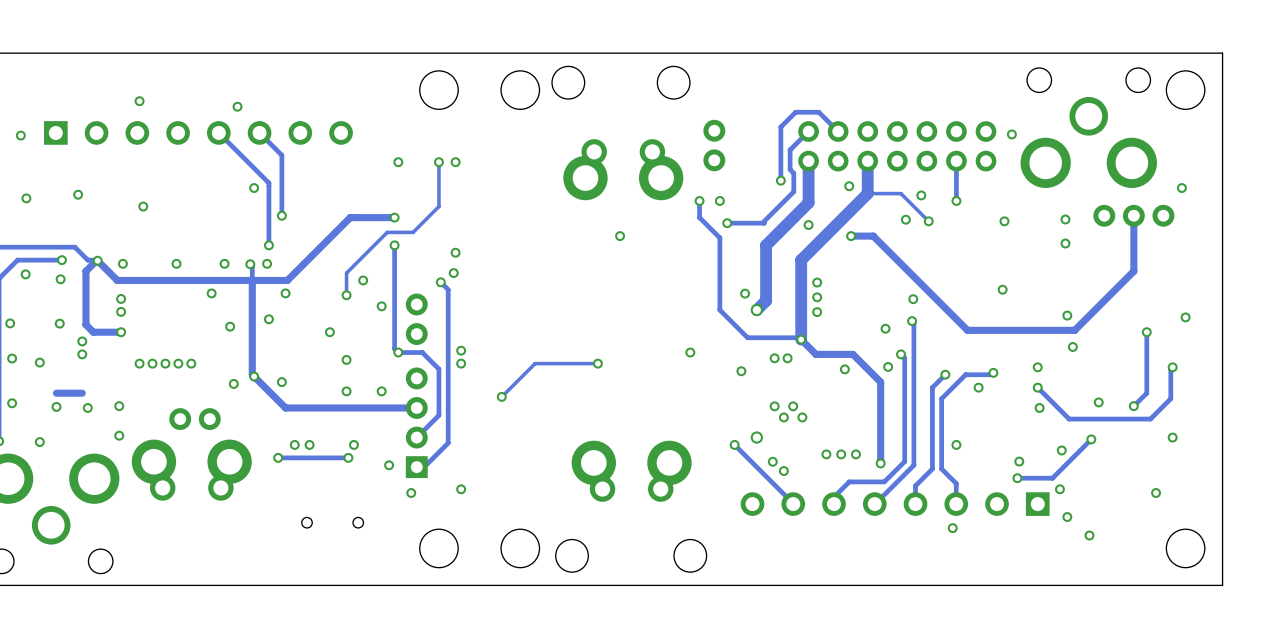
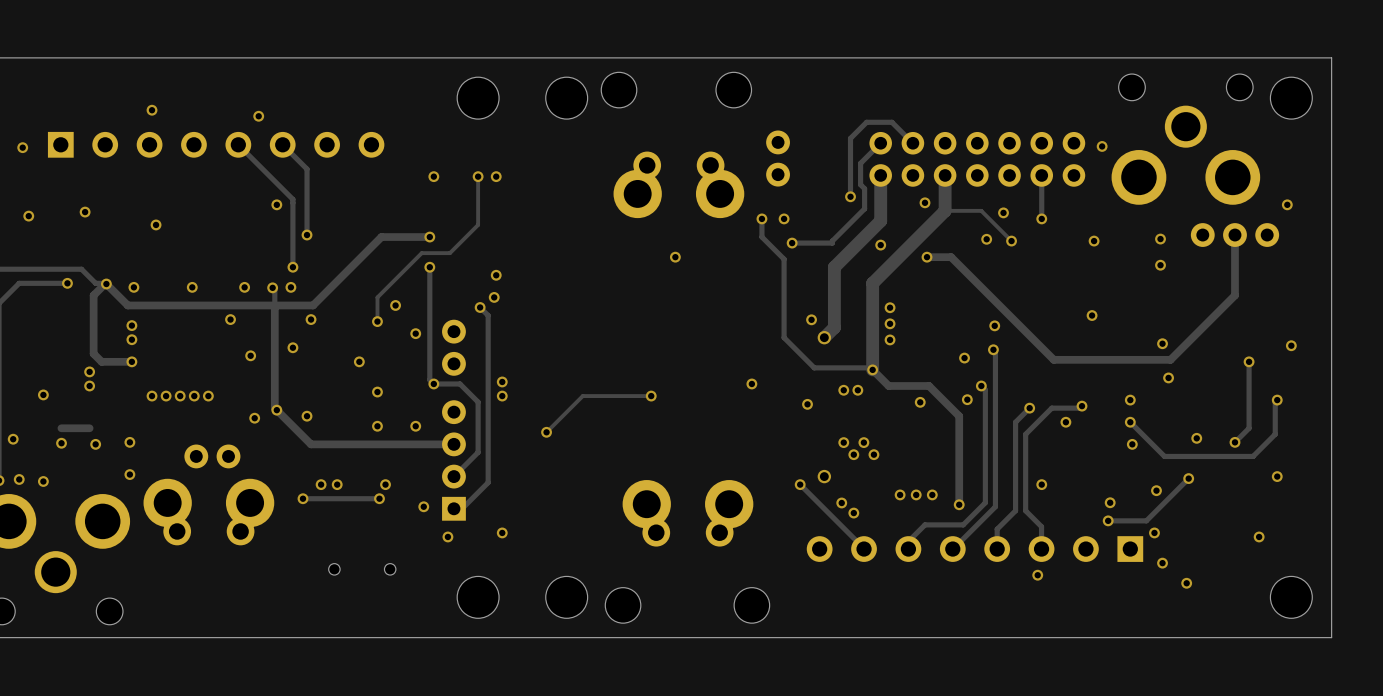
via: (25, 274) -> none
via: (60, 279) -> none
via: (10, 323) -> none
via: (59, 323) -> none
via: (12, 358) -> none
via: none -> (19, 479)

